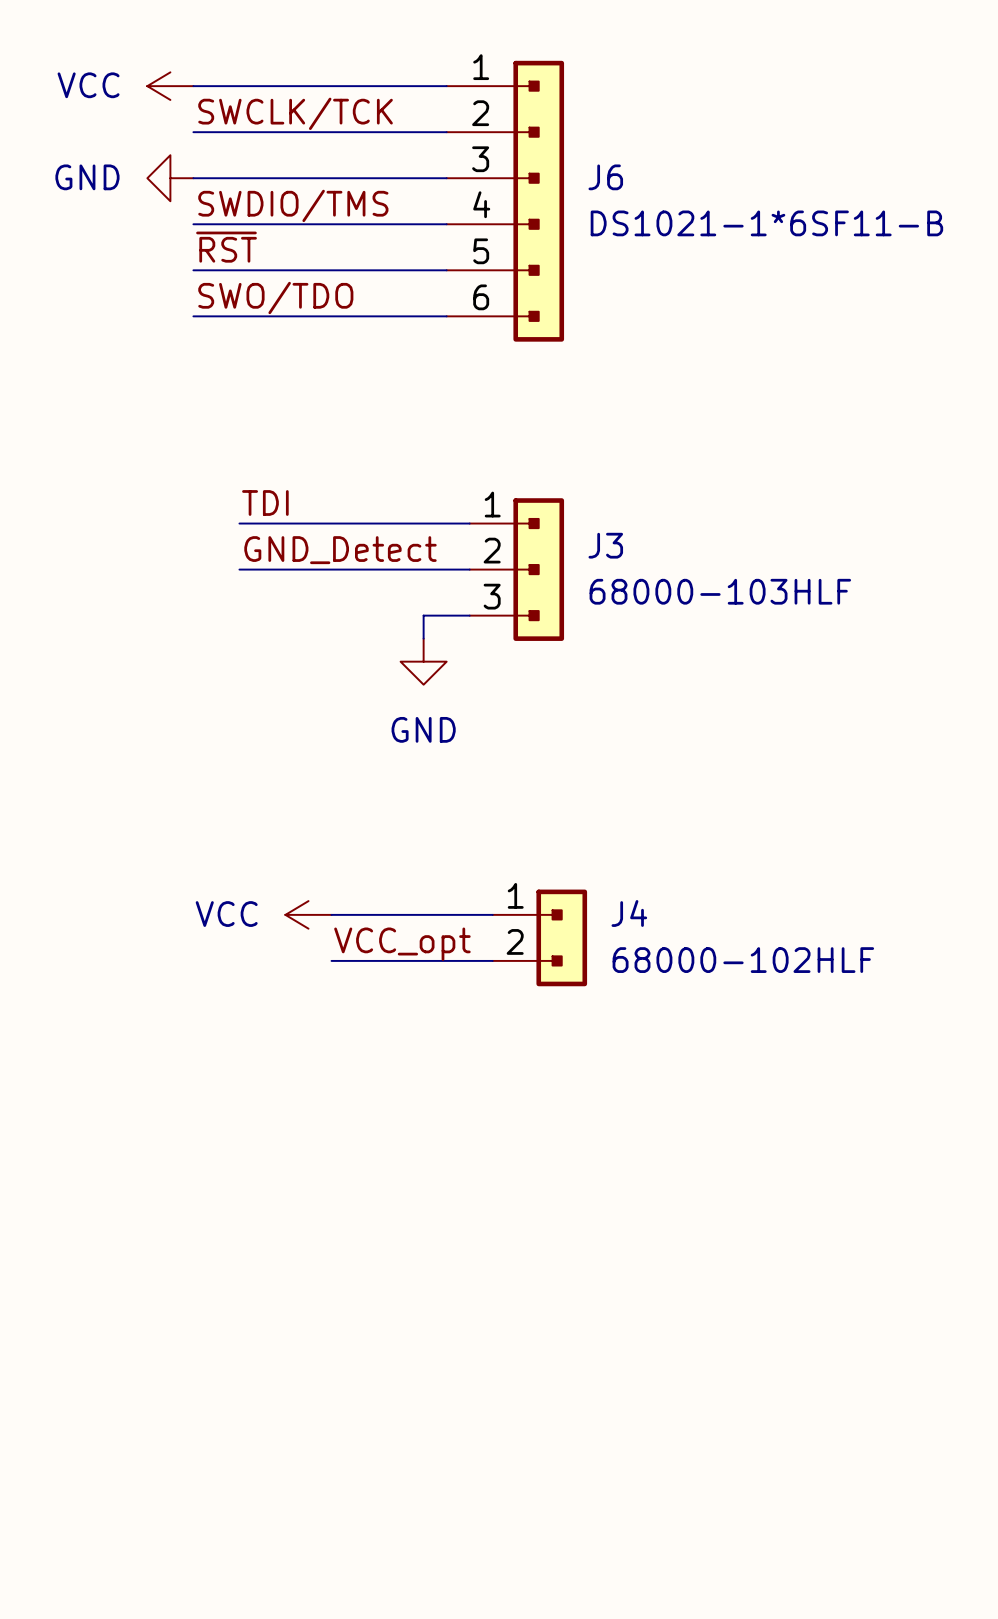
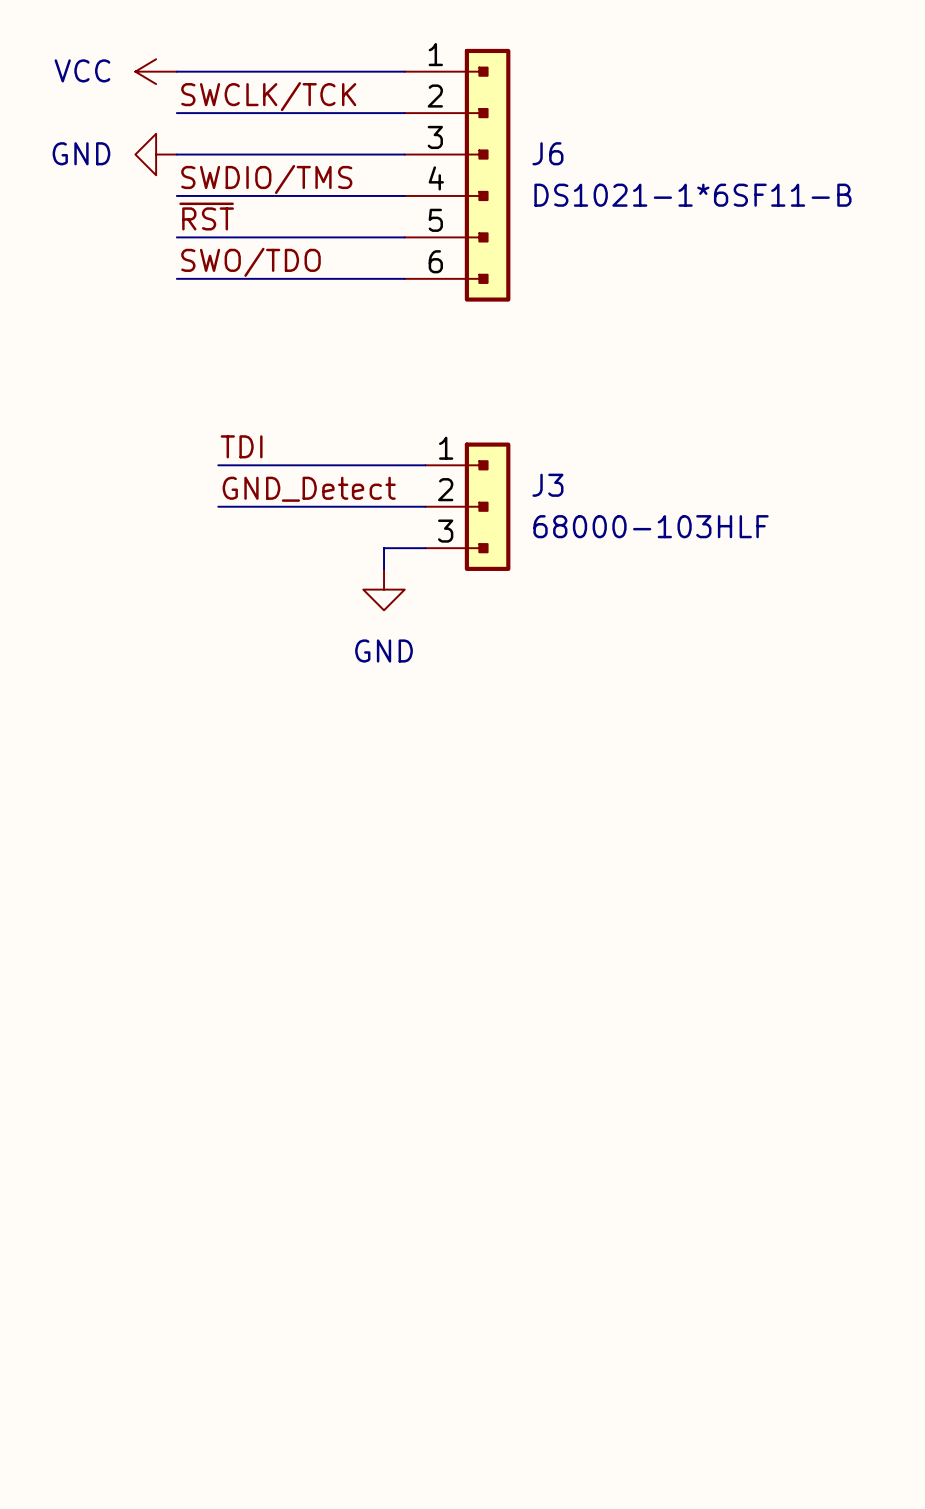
power symbol: VCC (308, 914) -> none
wire: (331, 914) (492, 914) -> none
J4: (539, 937) -> none
label: VCC_opt (402, 944) -> none
wire: (331, 960) (492, 960) -> none

